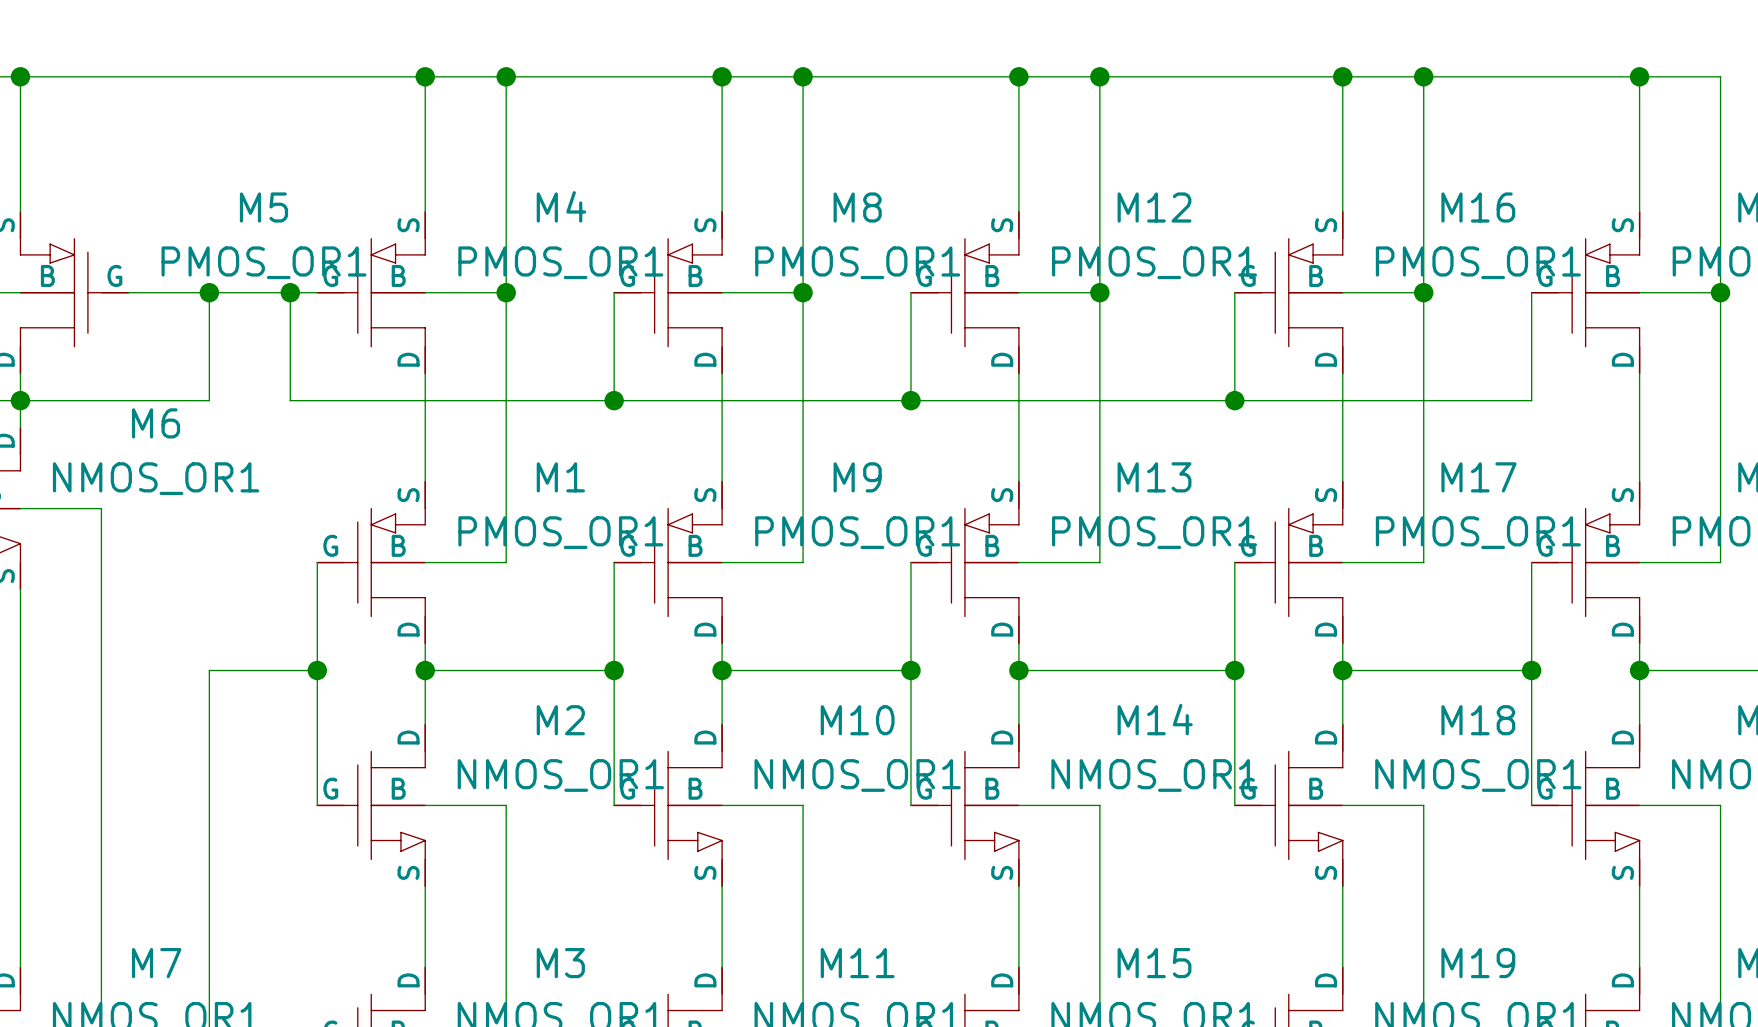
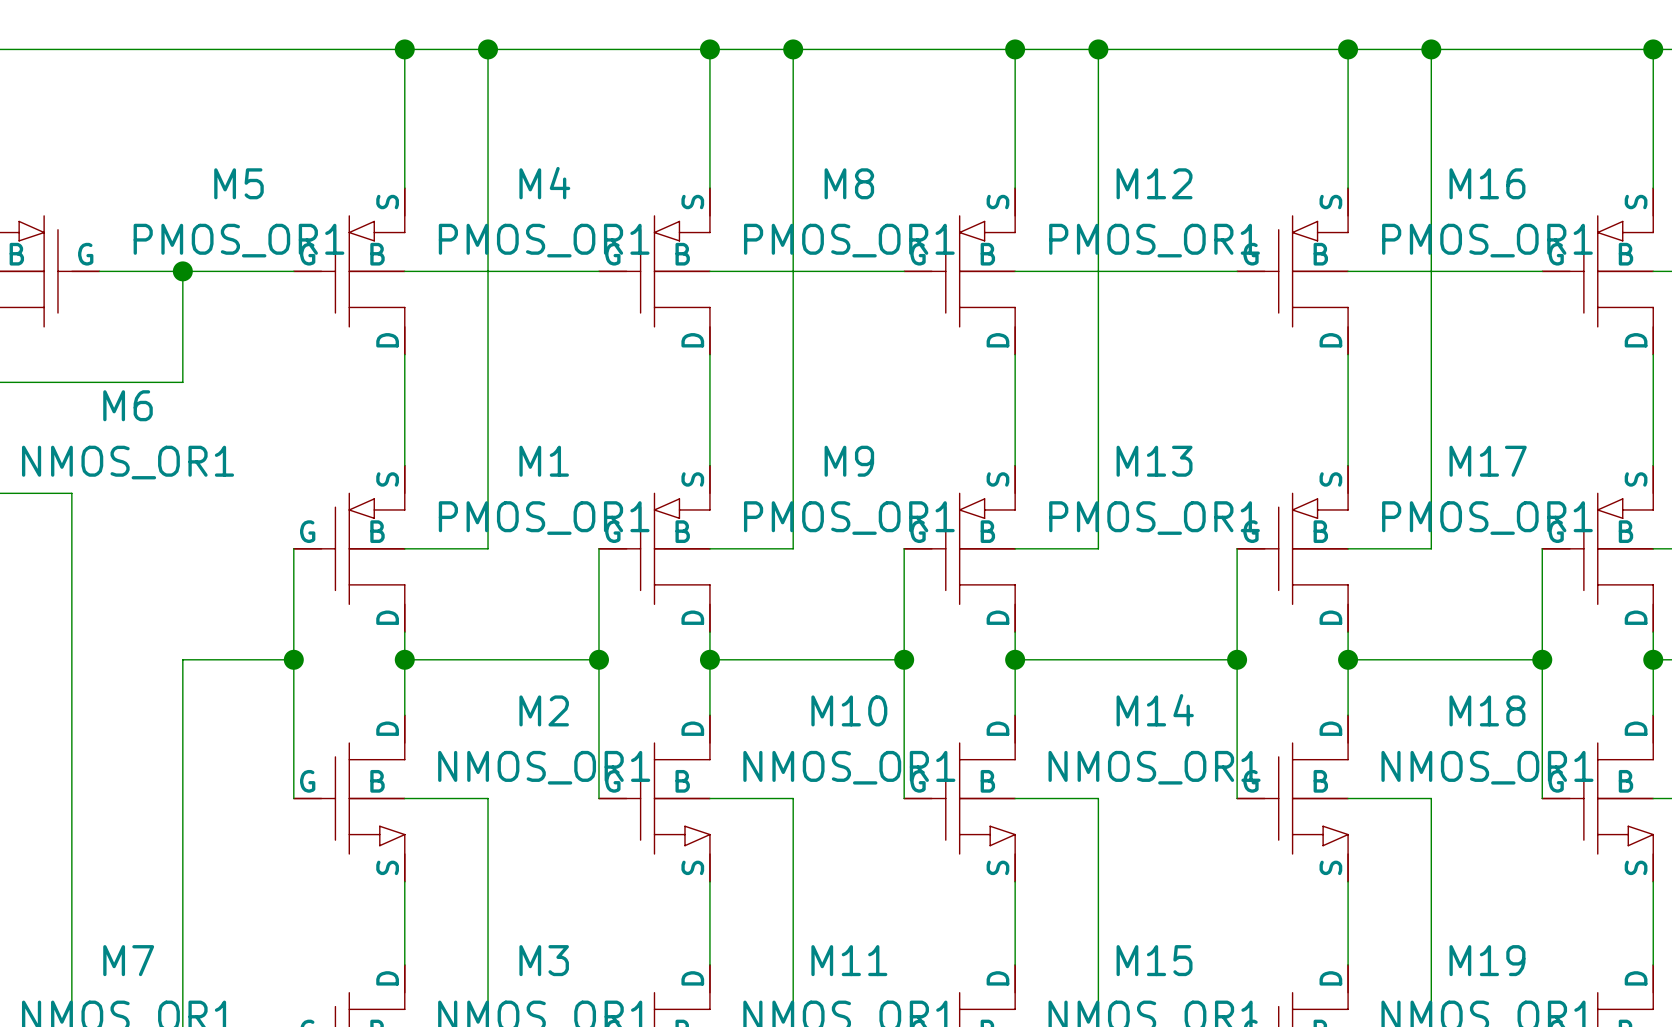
wire: (290, 292) (290, 400) (1531, 400) (1531, 292) -> (1431, 271) (1542, 271)
junction: (290, 292) -> none
junction: (506, 292) -> none
wire: (614, 292) (614, 400) -> (598, 271) (488, 271)
junction: (803, 292) -> none
wire: (910, 292) (910, 400) -> (904, 271) (793, 271)
junction: (1099, 292) -> none
wire: (1234, 292) (1234, 400) -> (1237, 271) (1098, 271)
junction: (1423, 292) -> none
junction: (614, 400) -> none
junction: (910, 400) -> none
junction: (1234, 400) -> none

